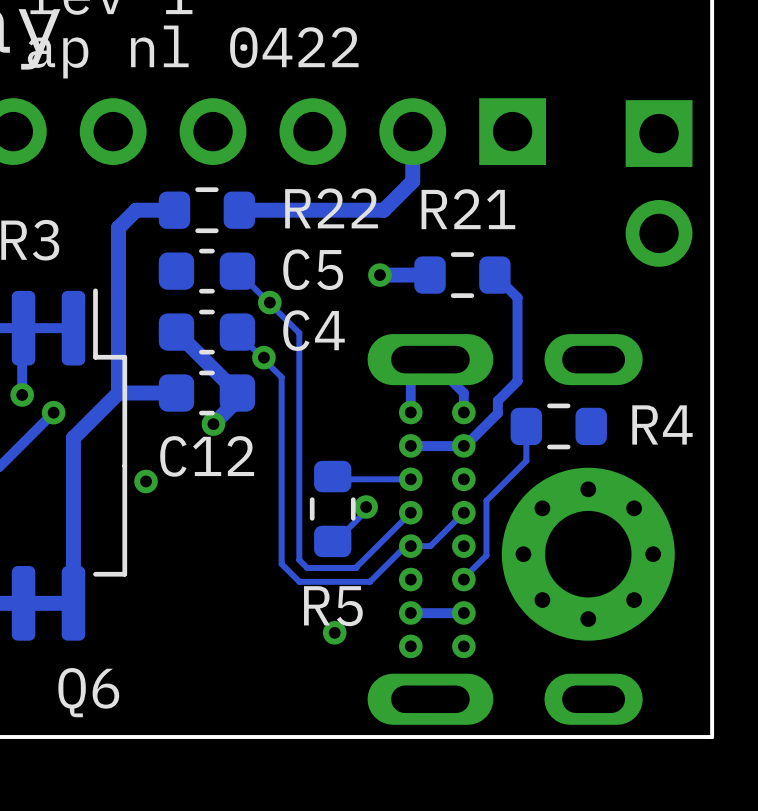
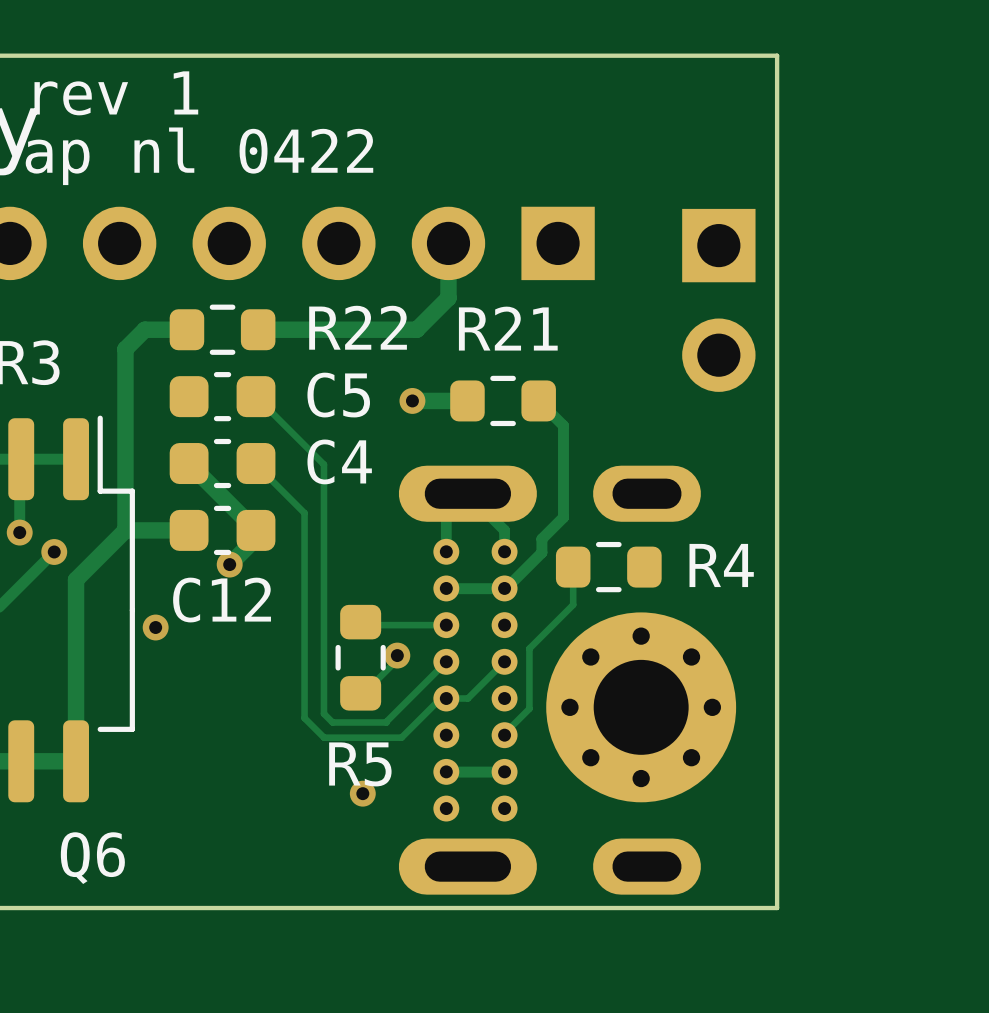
via: (269, 302) -> none
via: (263, 357) -> none

